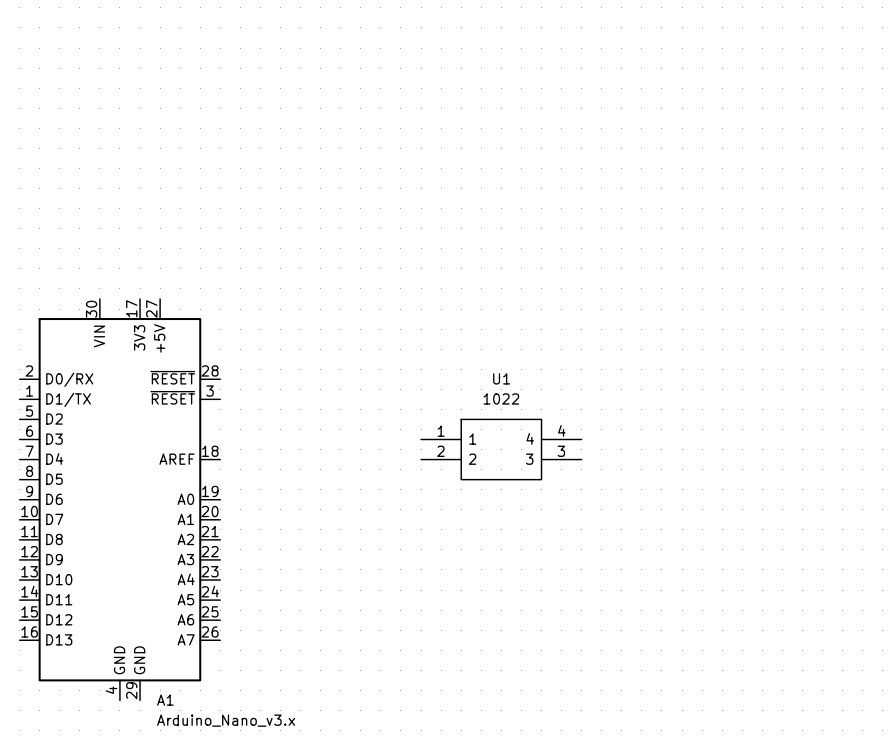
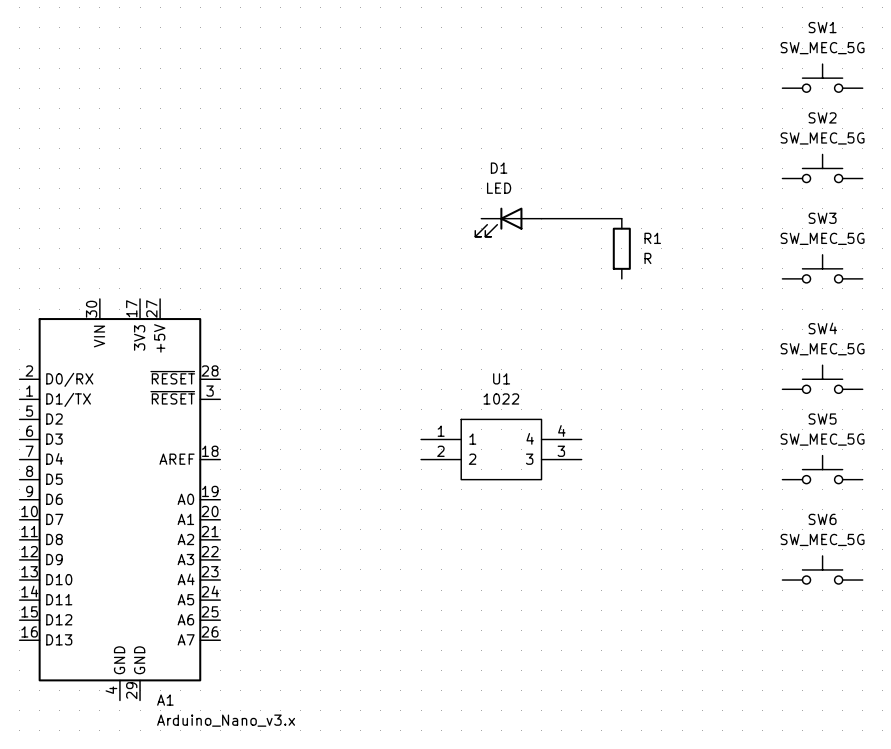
SW1: none -> SW_MEC_5G (822, 78)
SW2: none -> SW_MEC_5G (822, 168)
wire: none -> (541, 218) (621, 218)
D1: none -> LED (508, 222)
R1: none -> R (621, 248)
SW3: none -> SW_MEC_5G (822, 268)
SW4: none -> SW_MEC_5G (822, 379)
SW5: none -> SW_MEC_5G (822, 469)
SW6: none -> SW_MEC_5G (822, 569)

